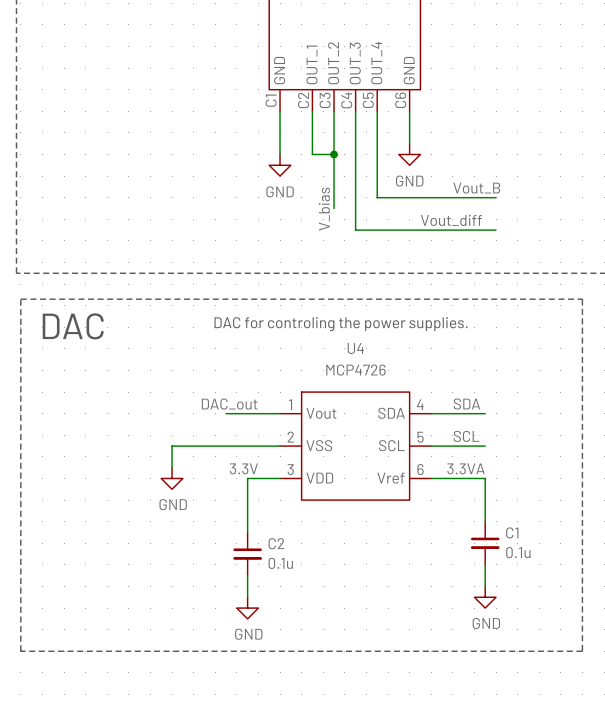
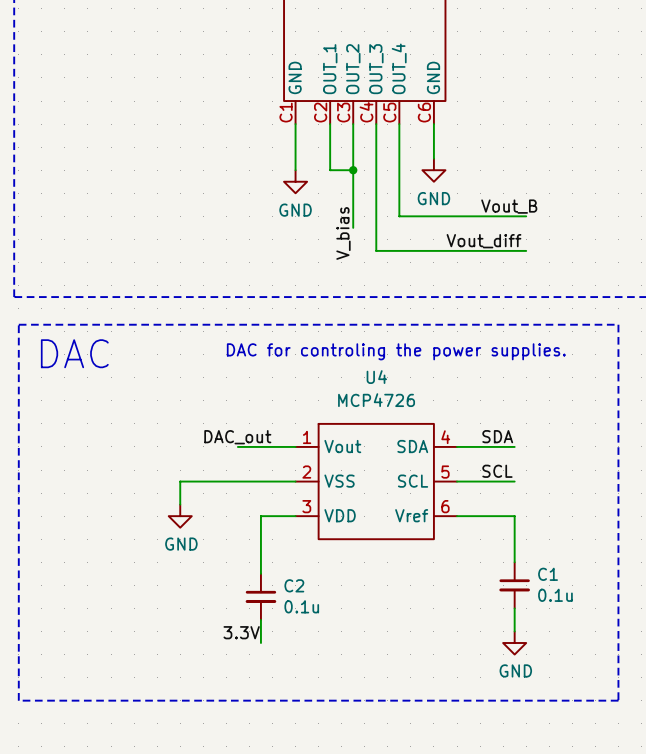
label position: 3.3V (243, 468) -> 3.3V (241, 632)
label: 3.3VA (466, 468) -> none
power symbol: GND (247, 608) -> none

